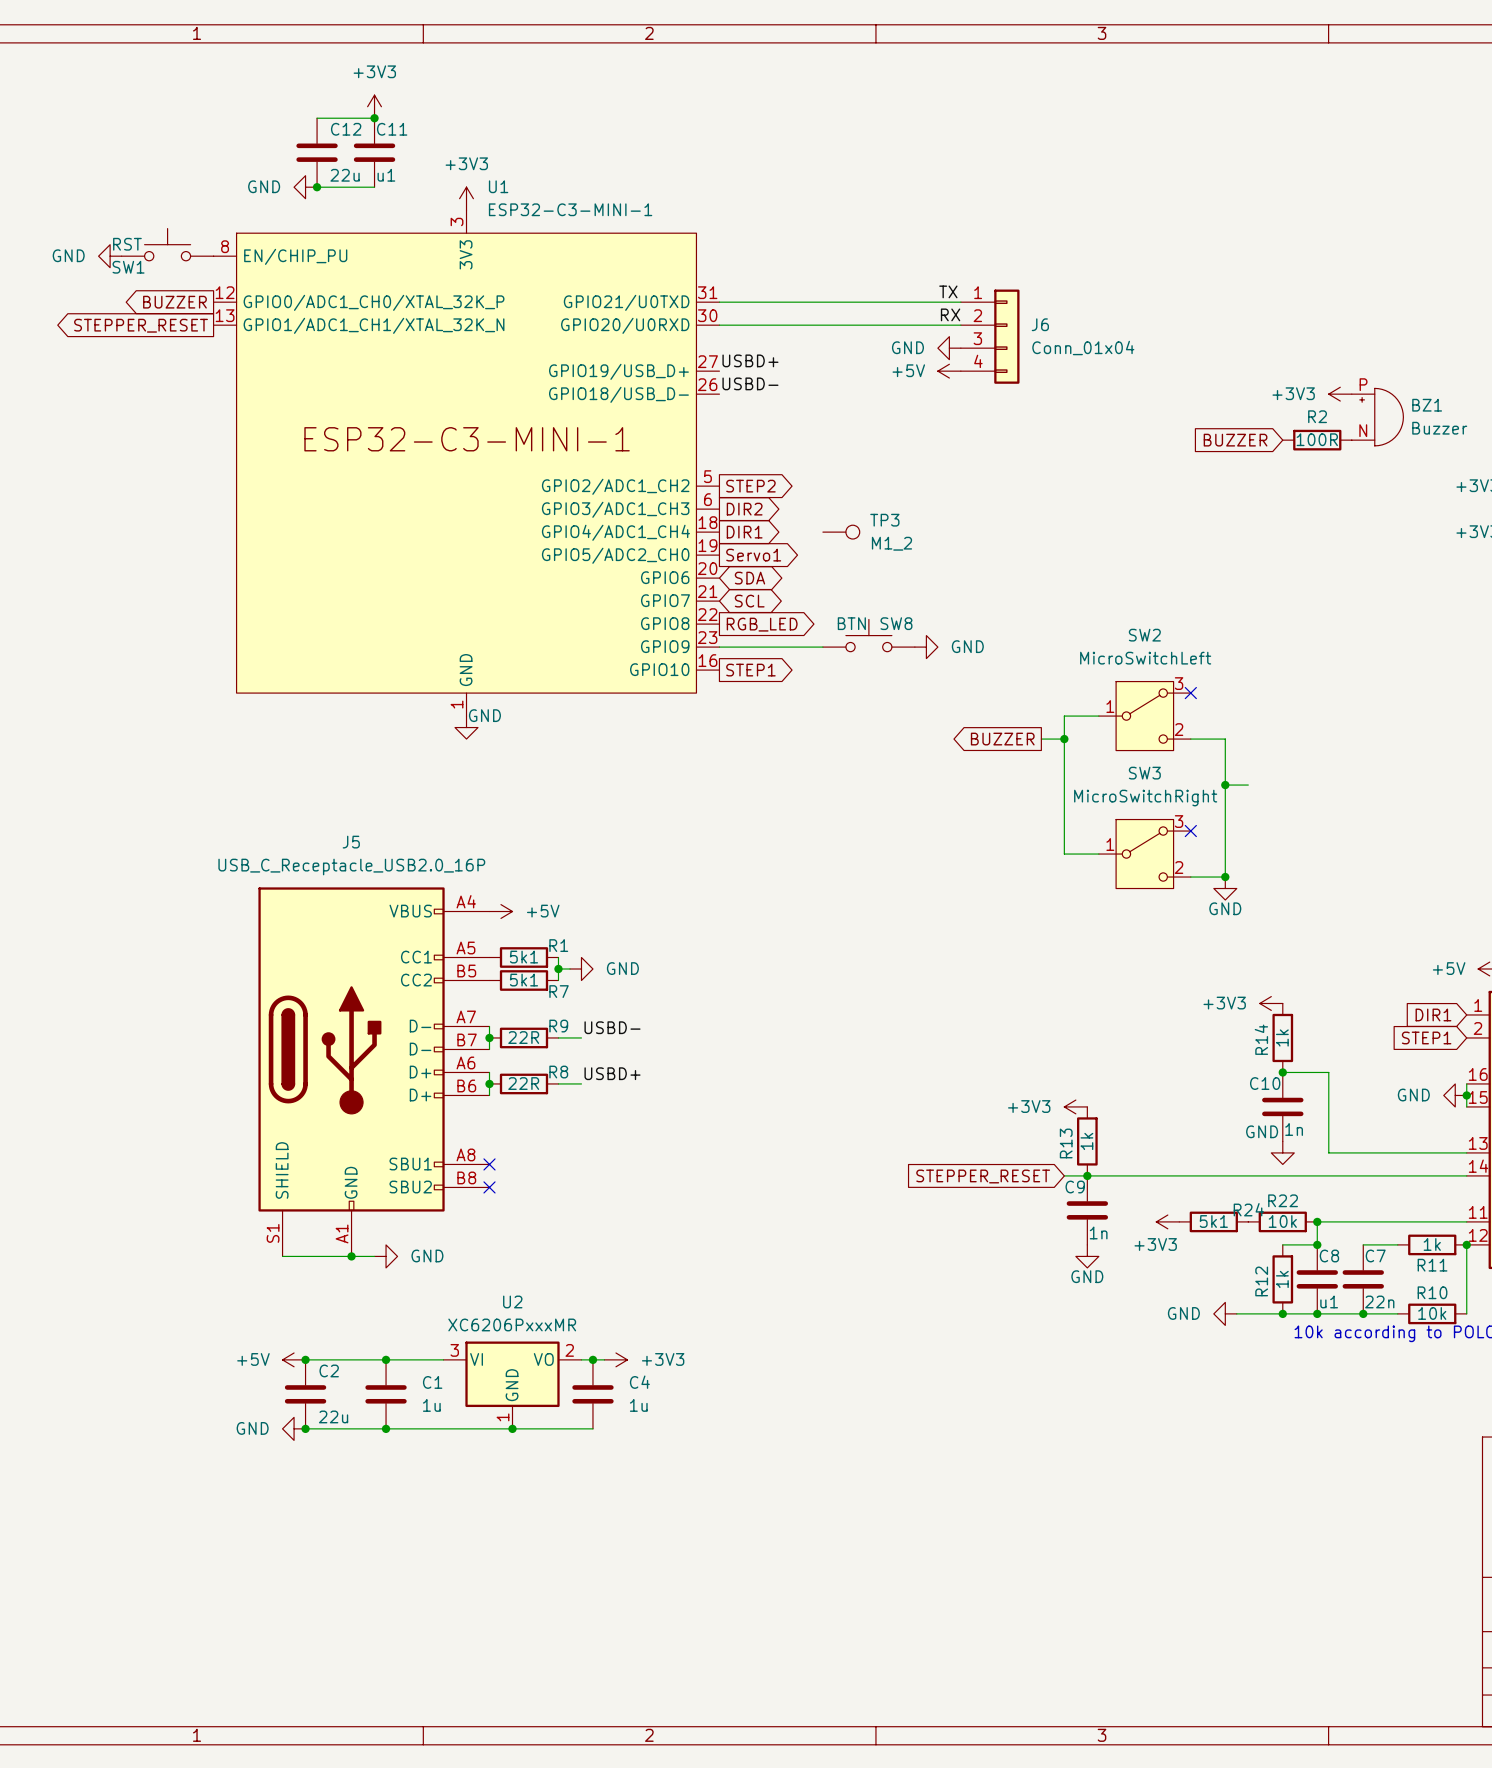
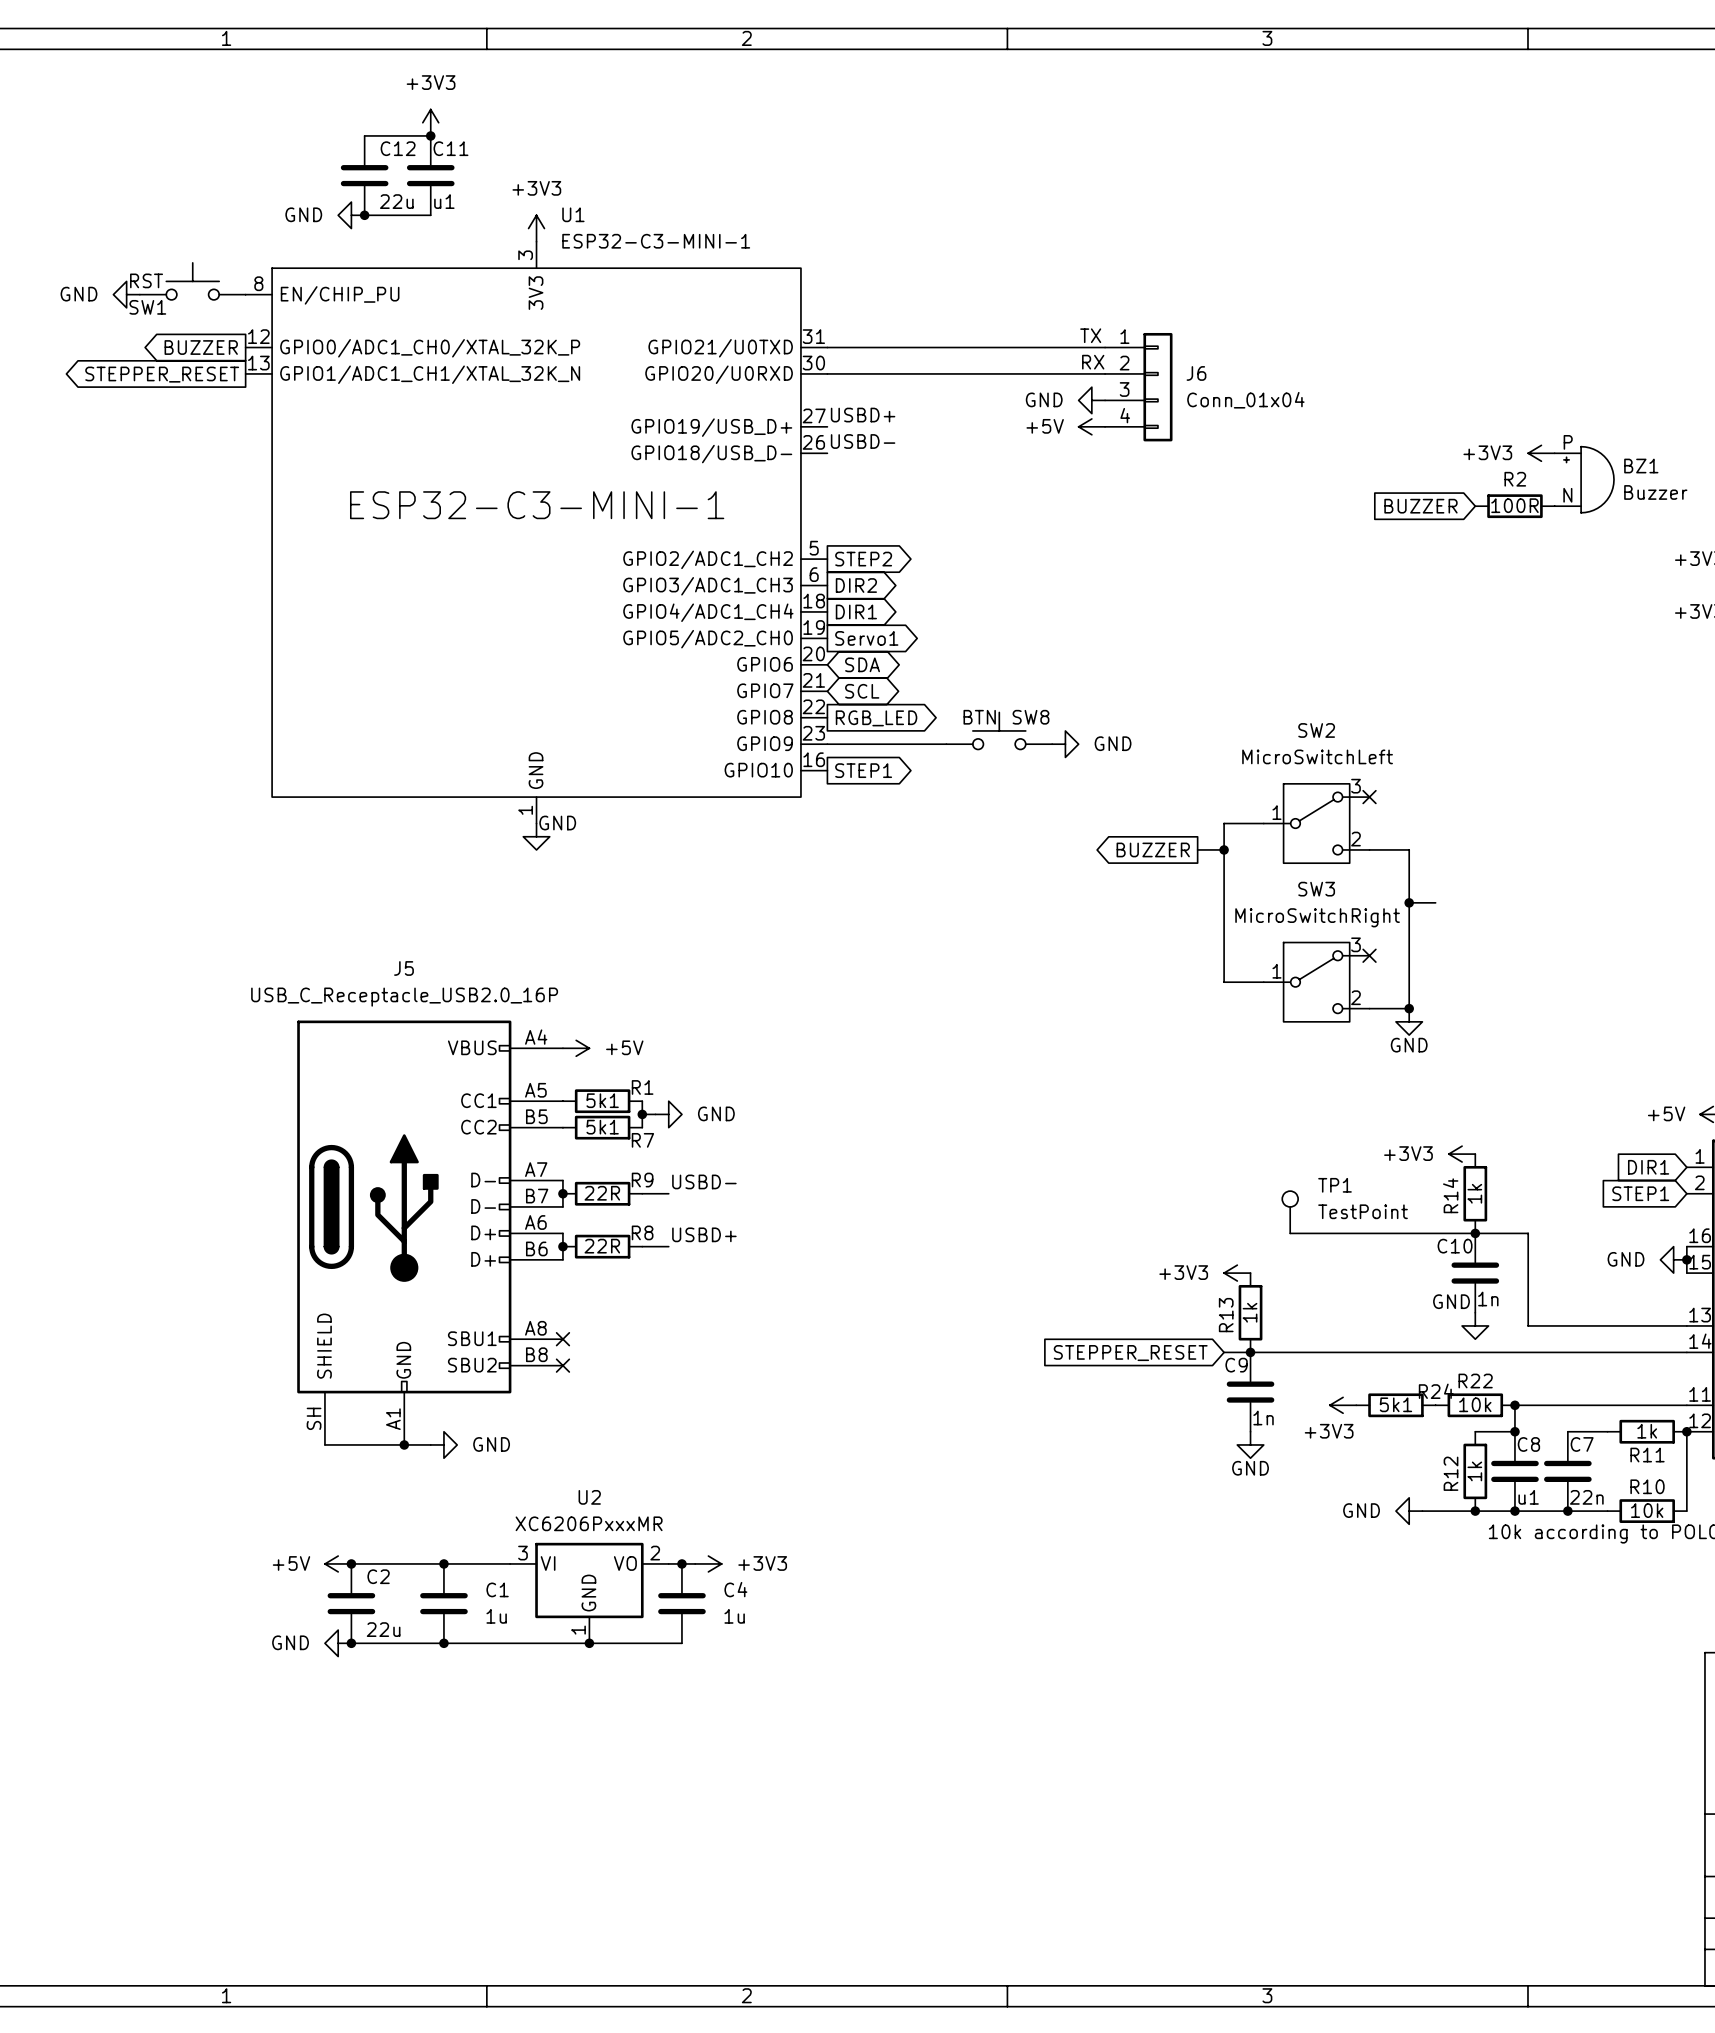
TP3: M1_2 (841, 532) -> none
TP1: none -> TestPoint (1290, 1212)
wire: none -> (1290, 1233) (1475, 1233)
J5 pin number: S1 (273, 1233) -> SH (314, 1418)

